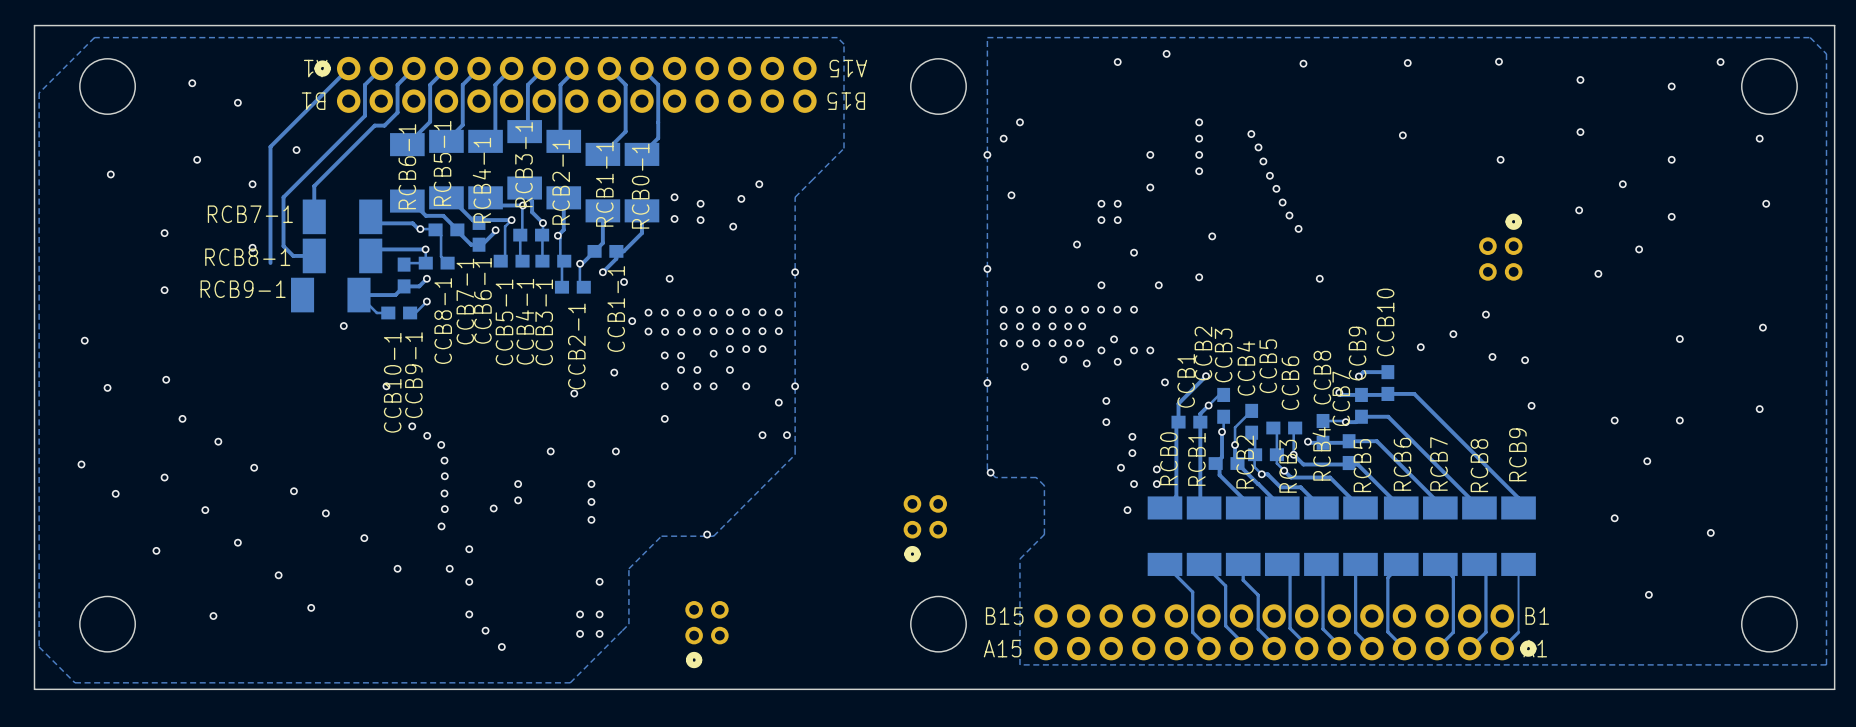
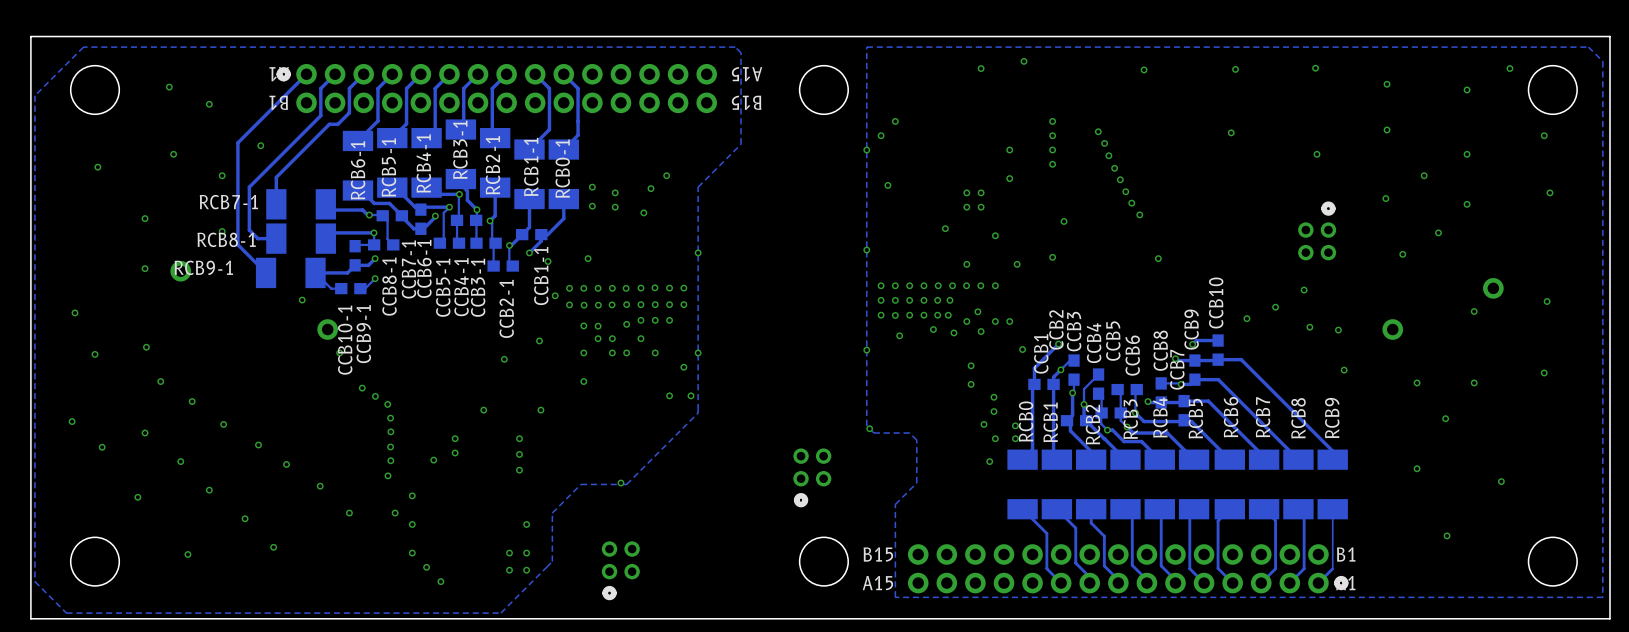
track: none -> (237, 244) (266, 272)
part: none -> (180, 271)
part: none -> (1493, 288)
part: none -> (327, 329)
part: none -> (1392, 329)

